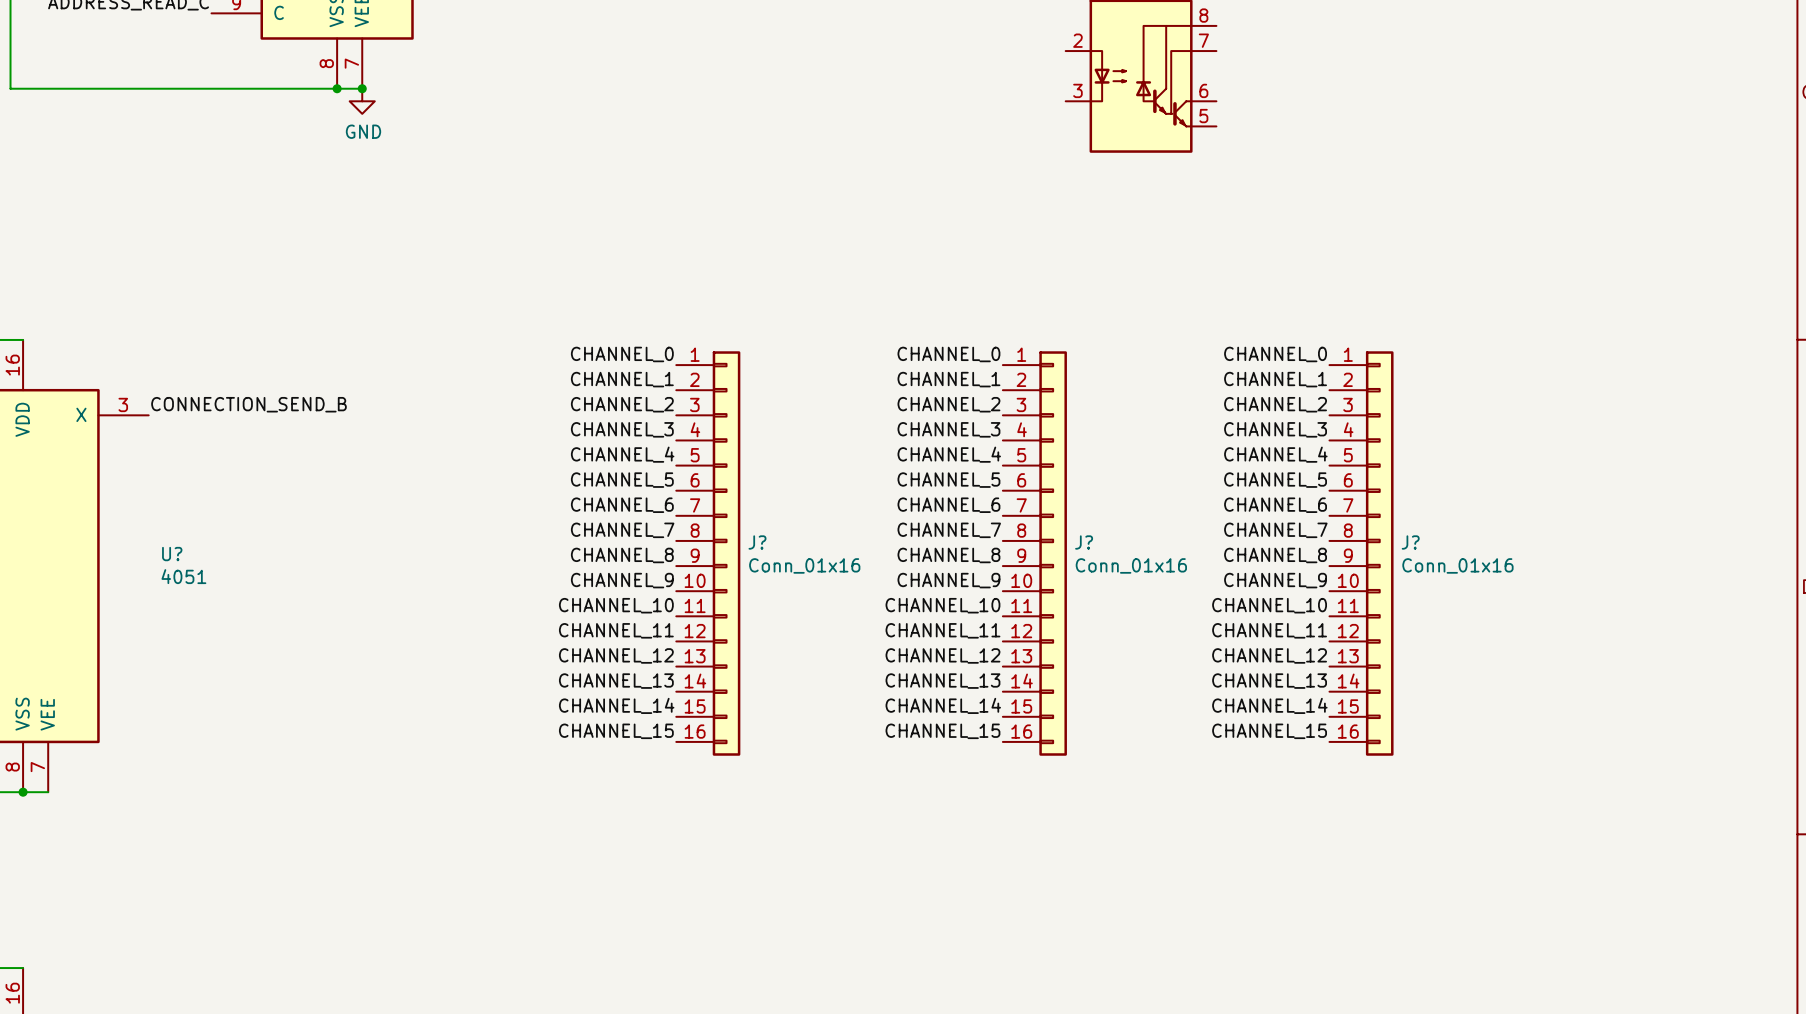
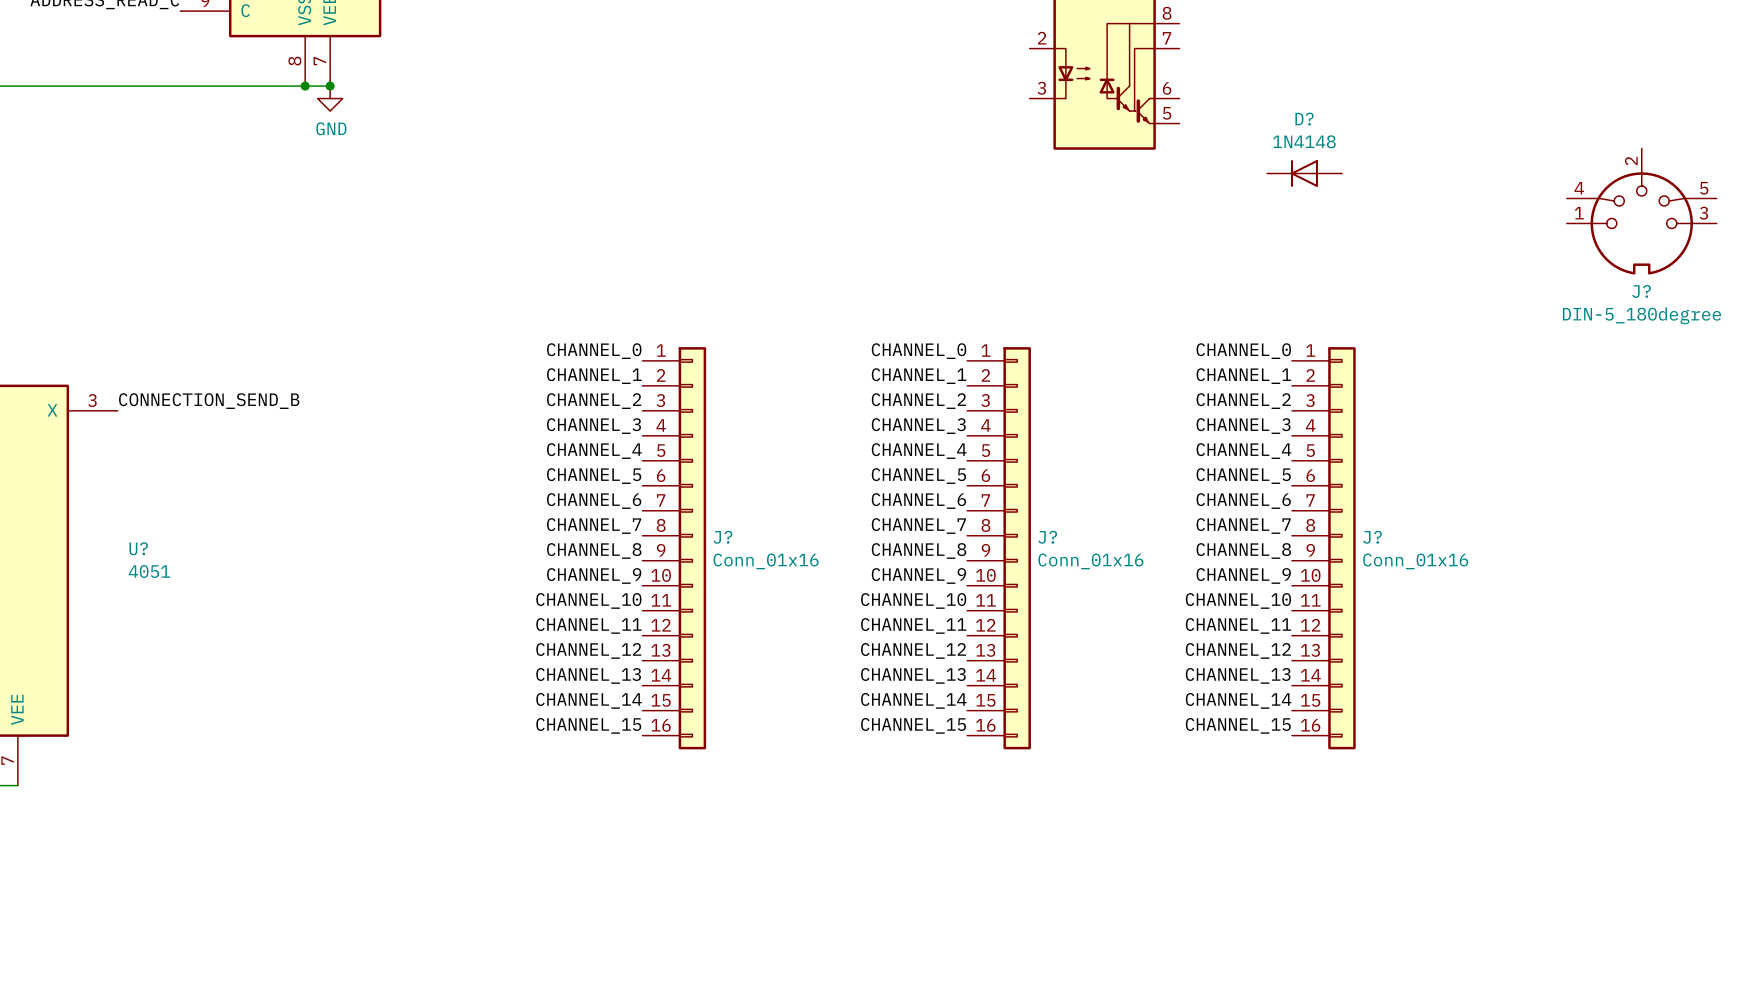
D?: none -> 1N4148 (1304, 173)
J?: none -> DIN-5_180degree (1641, 211)

